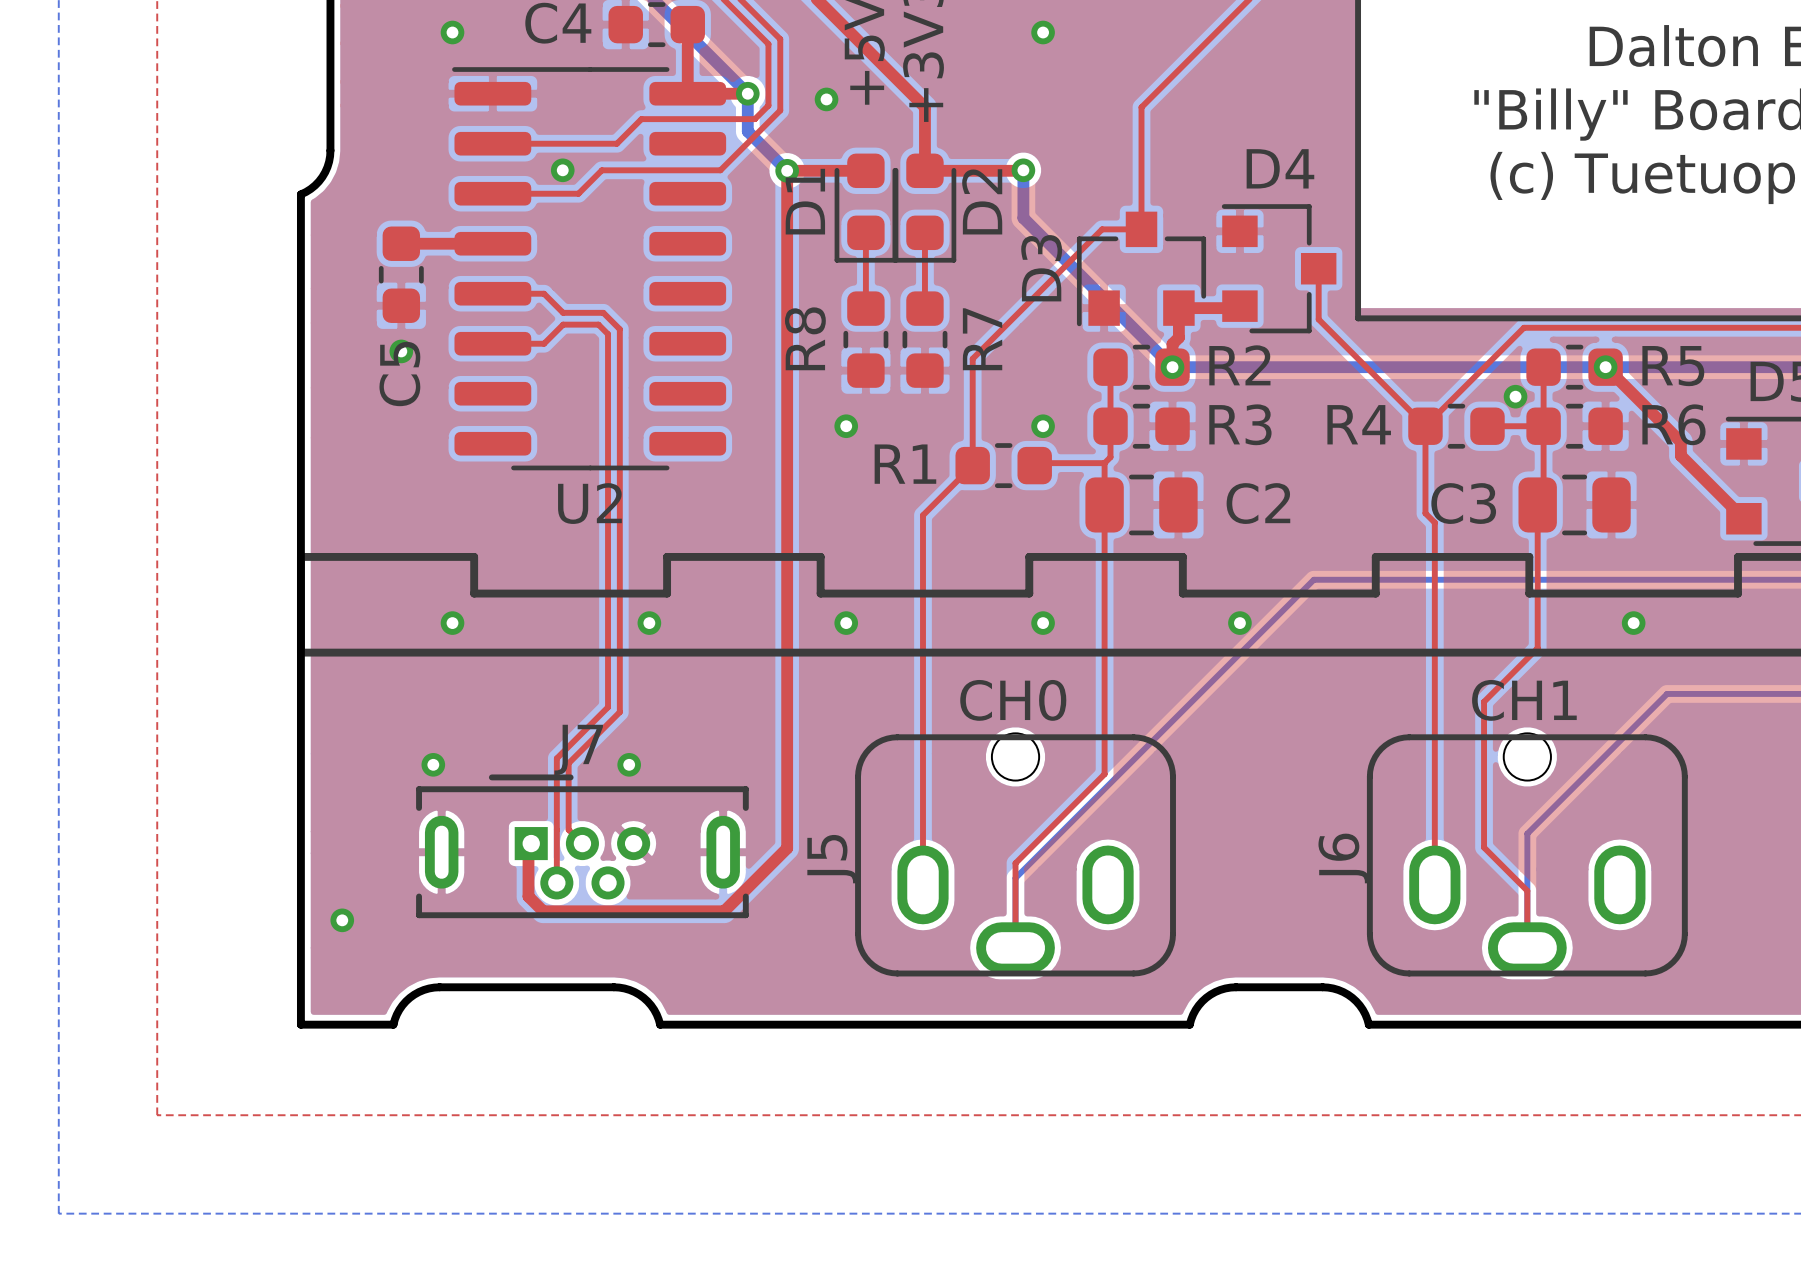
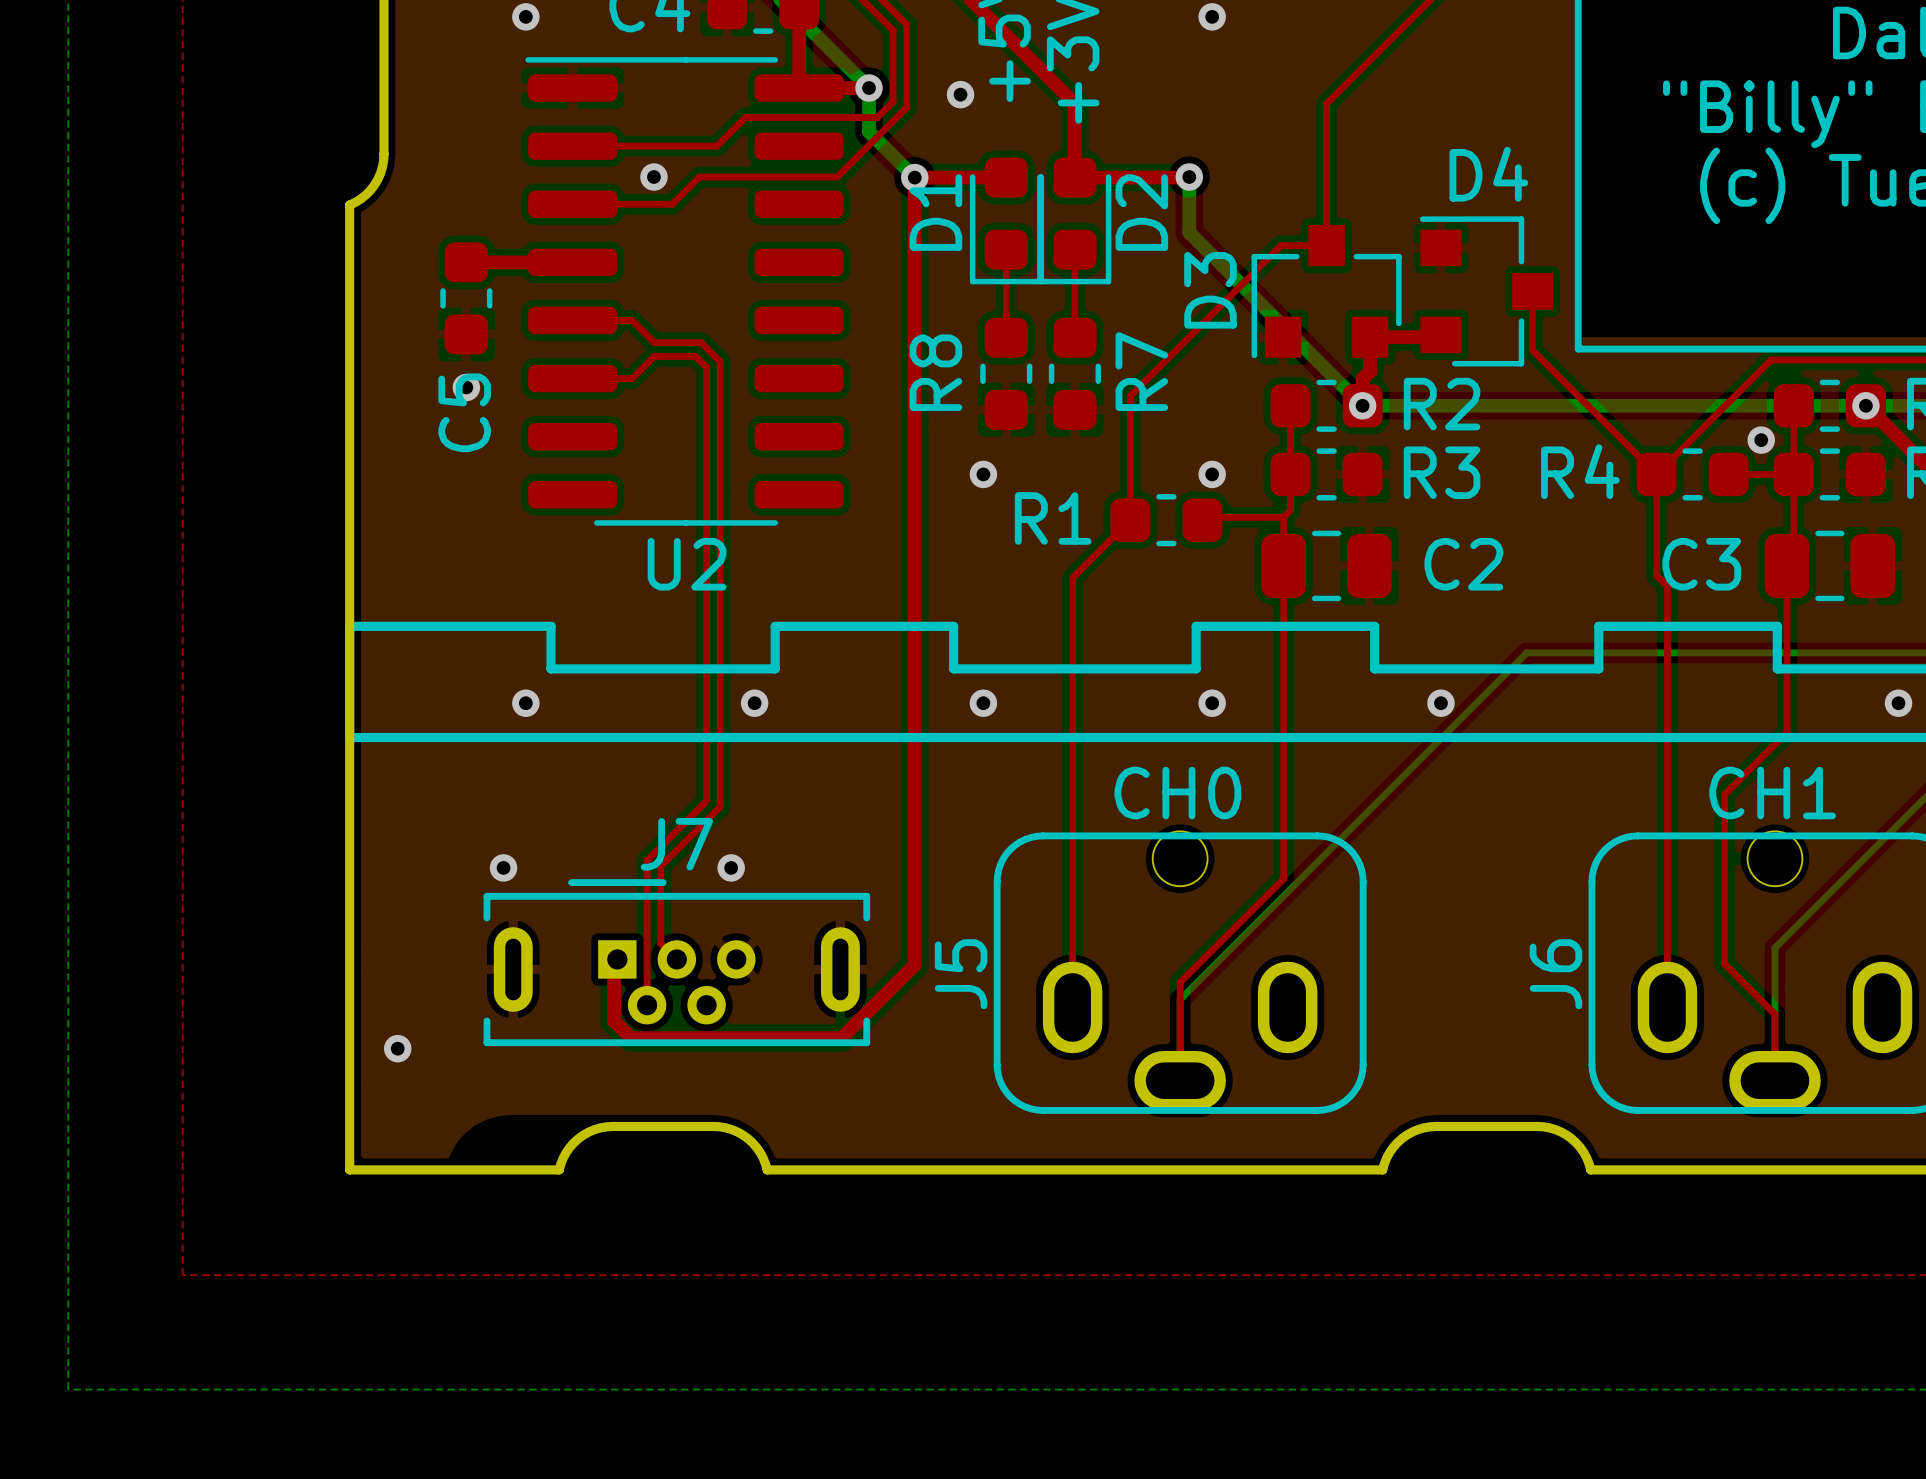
board edge: (527, 987) (429, 988) (414, 994) (405, 1001) (396, 1014) (393, 1024) -> (612, 1126) (594, 1129) (578, 1138) (566, 1152) (559, 1169) (457, 1169)

